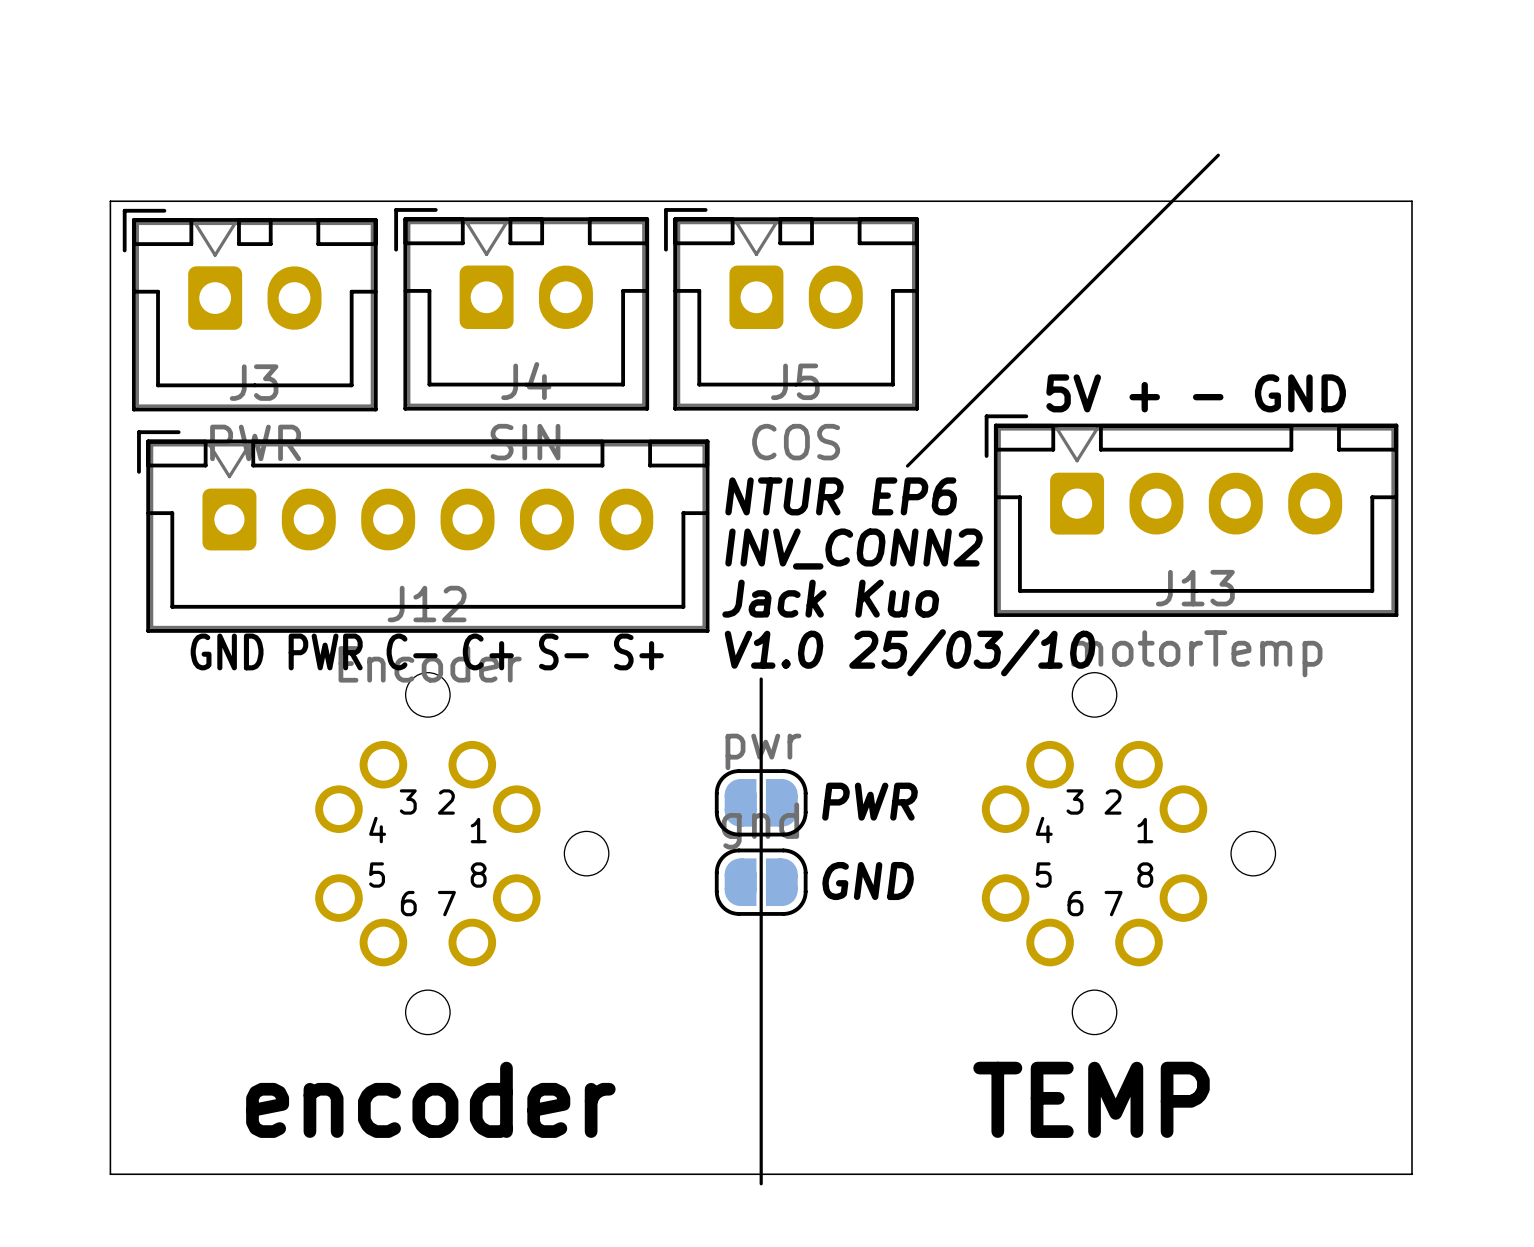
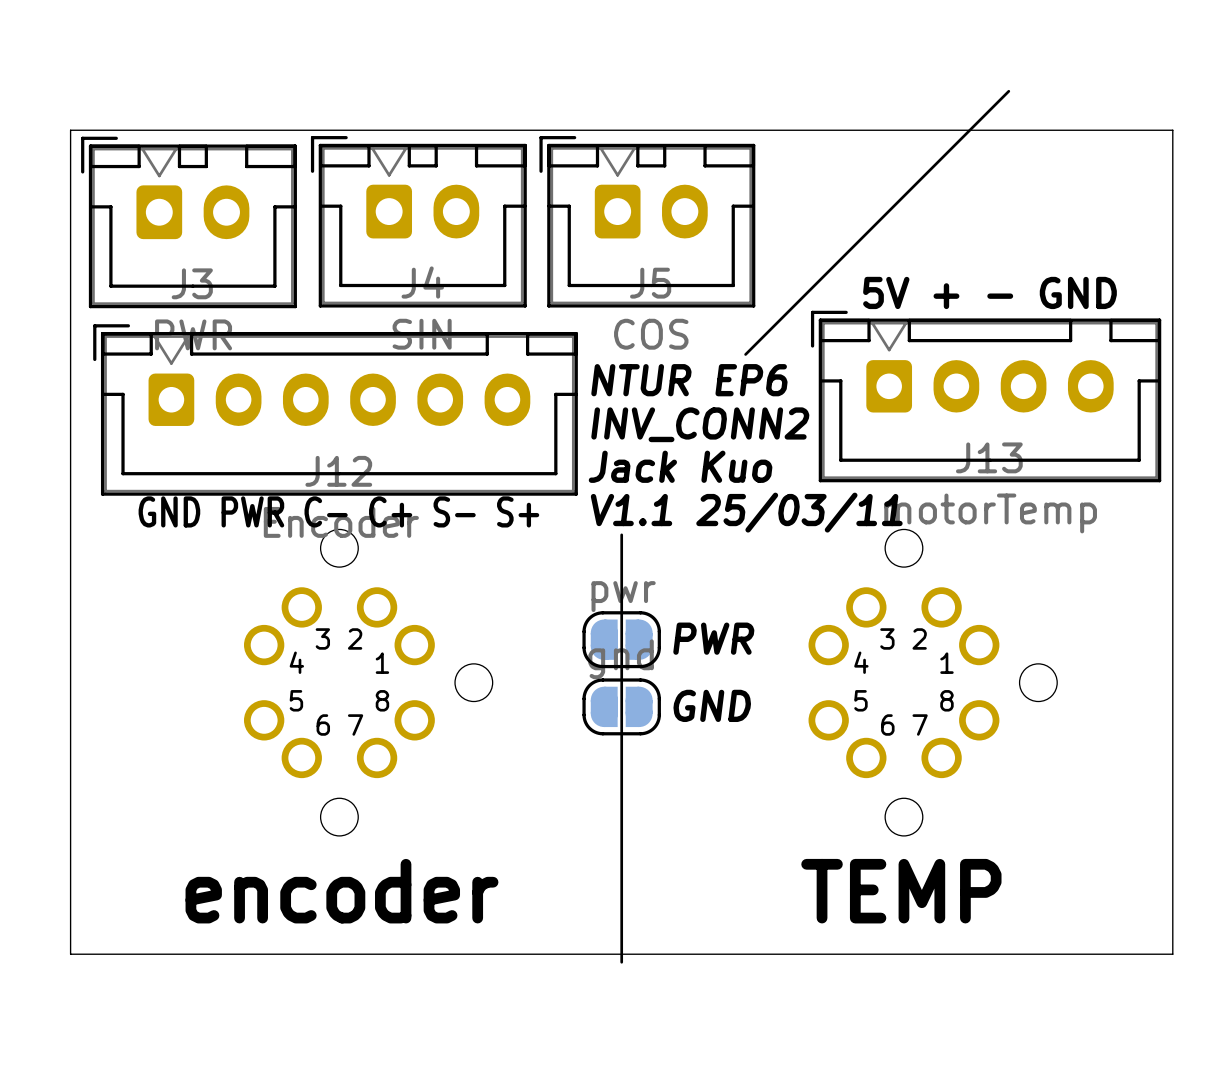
text: V1.0 25/03/10 (910, 652) -> V1.1 25/03/11 (746, 512)

